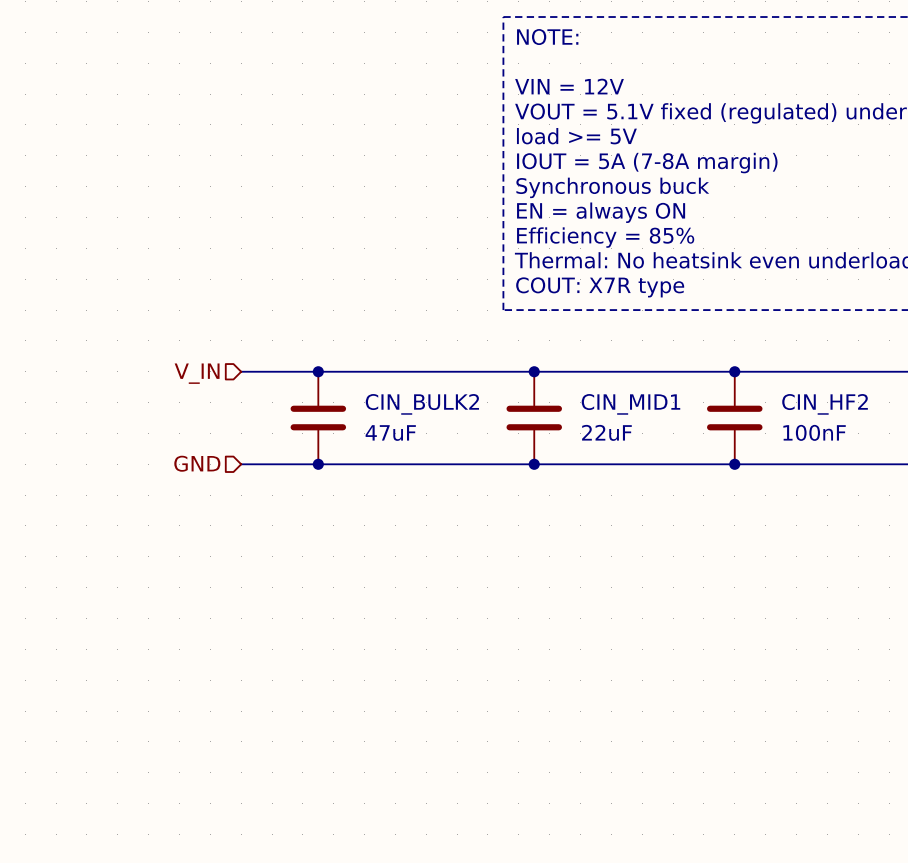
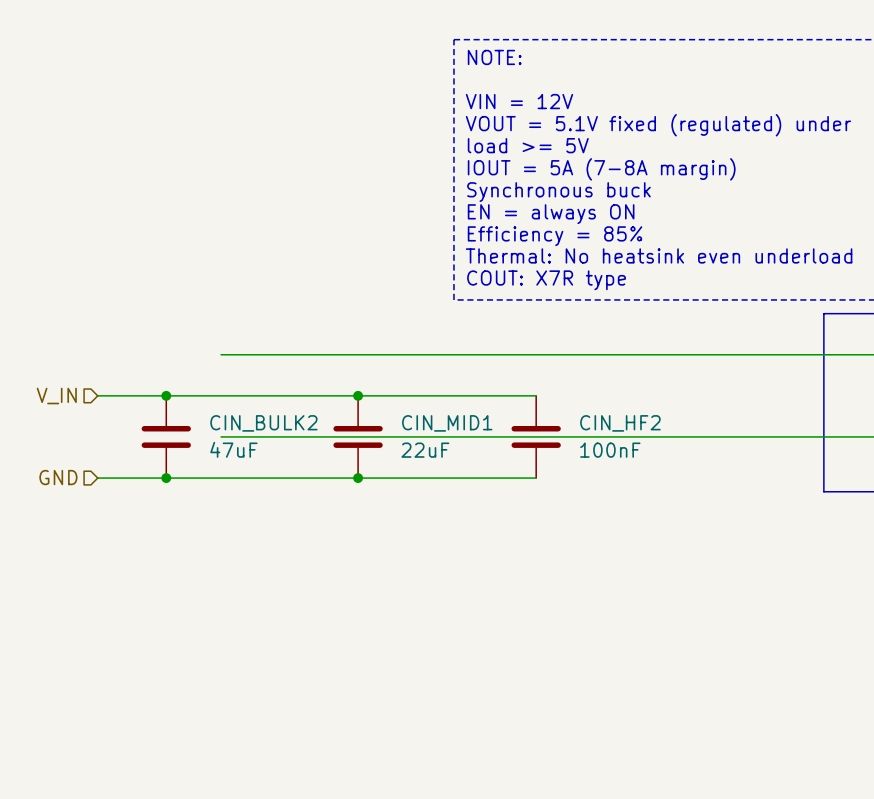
junction: (318, 371) -> none
junction: (534, 371) -> none
junction: (734, 371) -> none
hierarchical label position: V_IN (197, 373) -> V_IN (56, 396)
wire: none -> (97, 395) (536, 395)
junction: none -> (166, 395)
CIN_BULK2 position: (318, 418) -> (166, 436)
junction: none -> (358, 395)
CIN_MID1 position: (534, 418) -> (358, 436)
CIN_HF2 position: (734, 418) -> (536, 436)
hierarchical label position: GND (197, 463) -> GND (58, 477)
junction: (318, 464) -> none
junction: (534, 464) -> none
junction: (734, 464) -> none
wire: none -> (97, 478) (536, 478)
junction: none -> (166, 478)
junction: none -> (358, 478)

